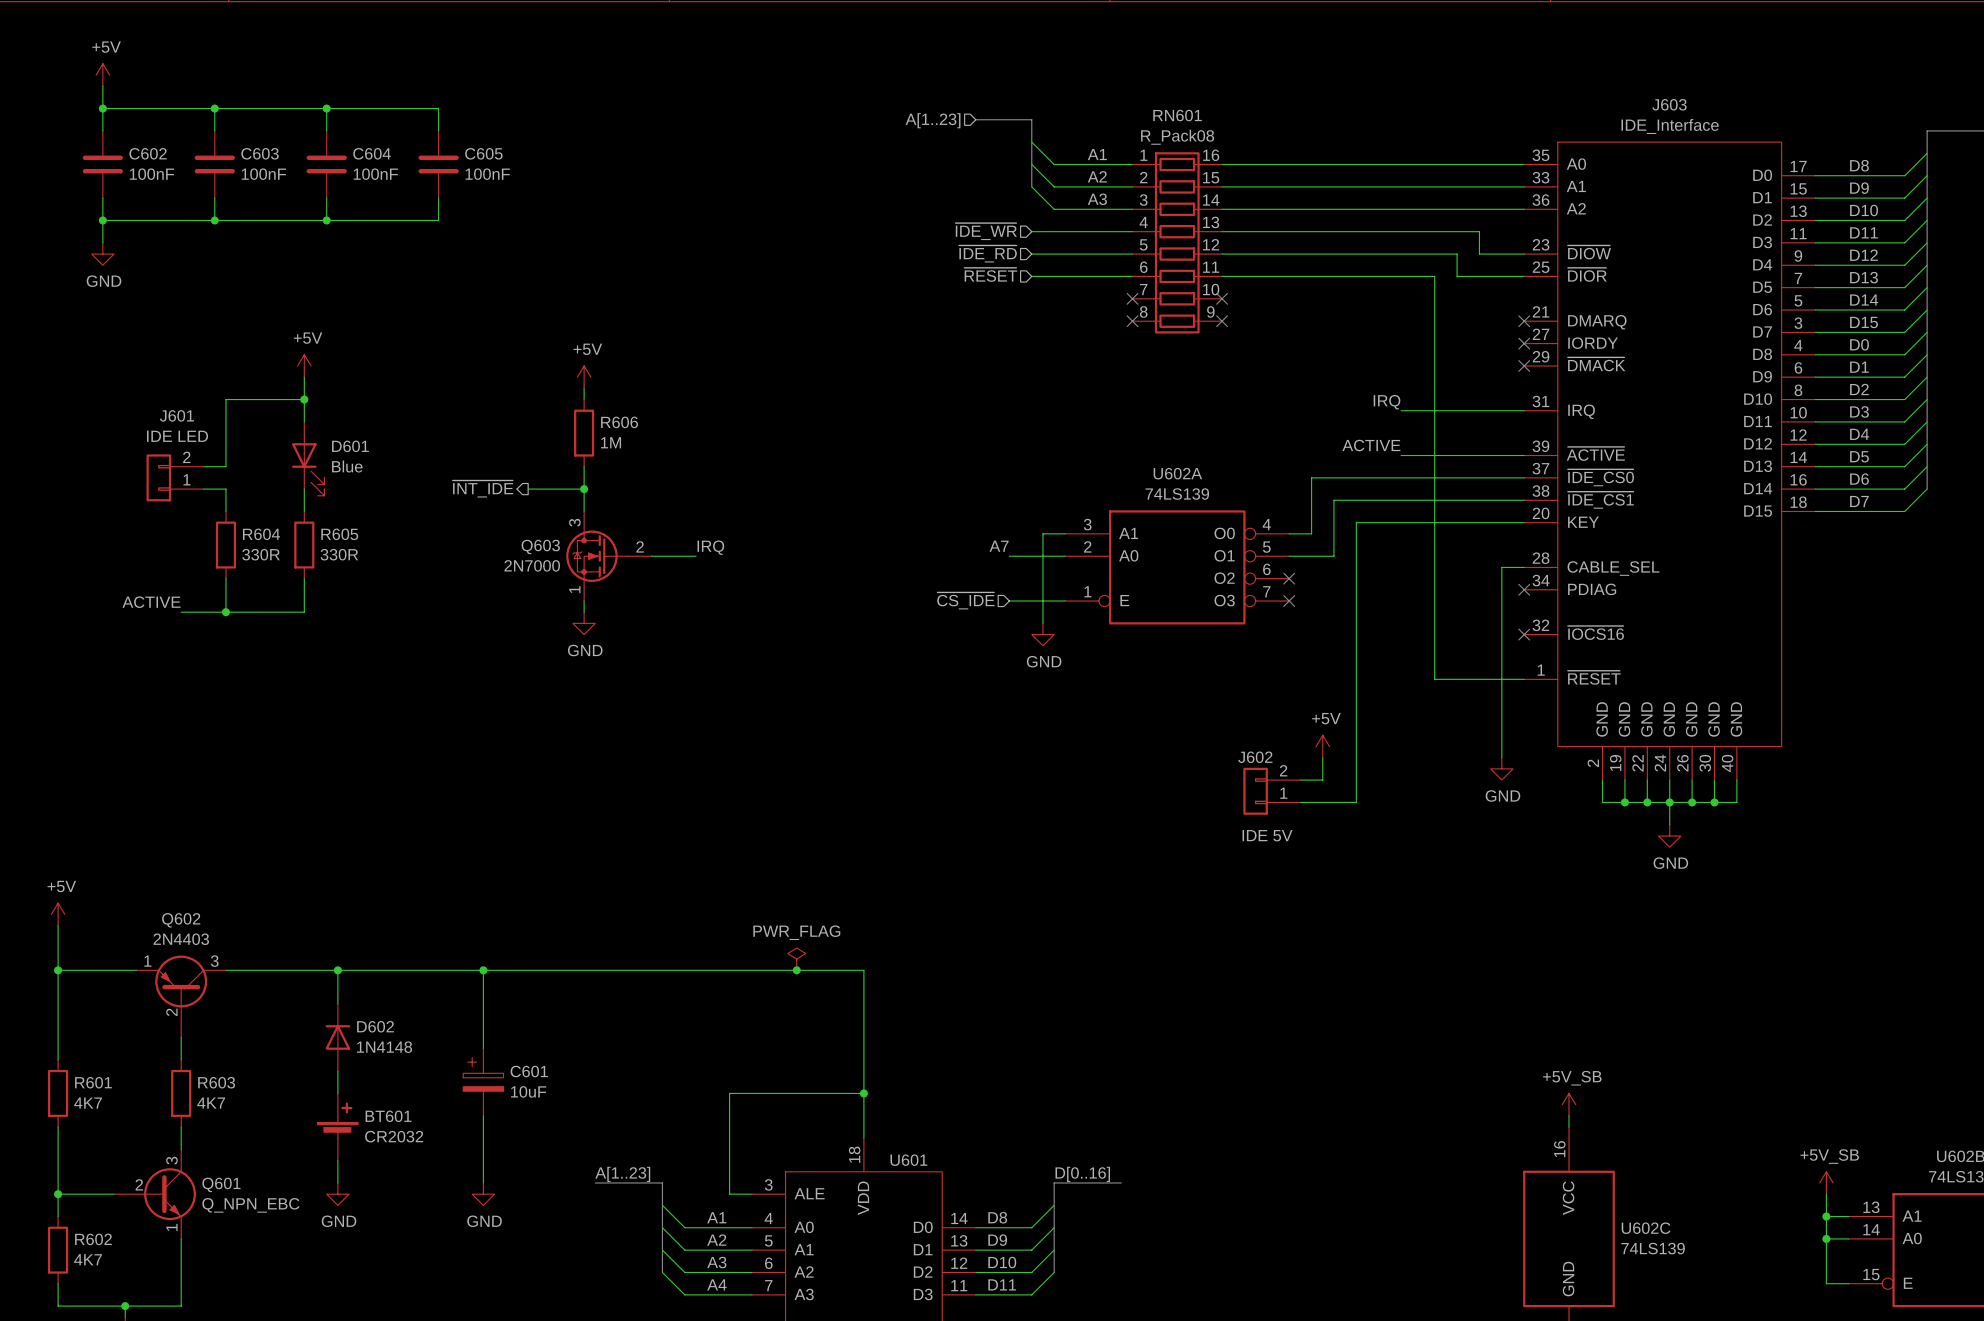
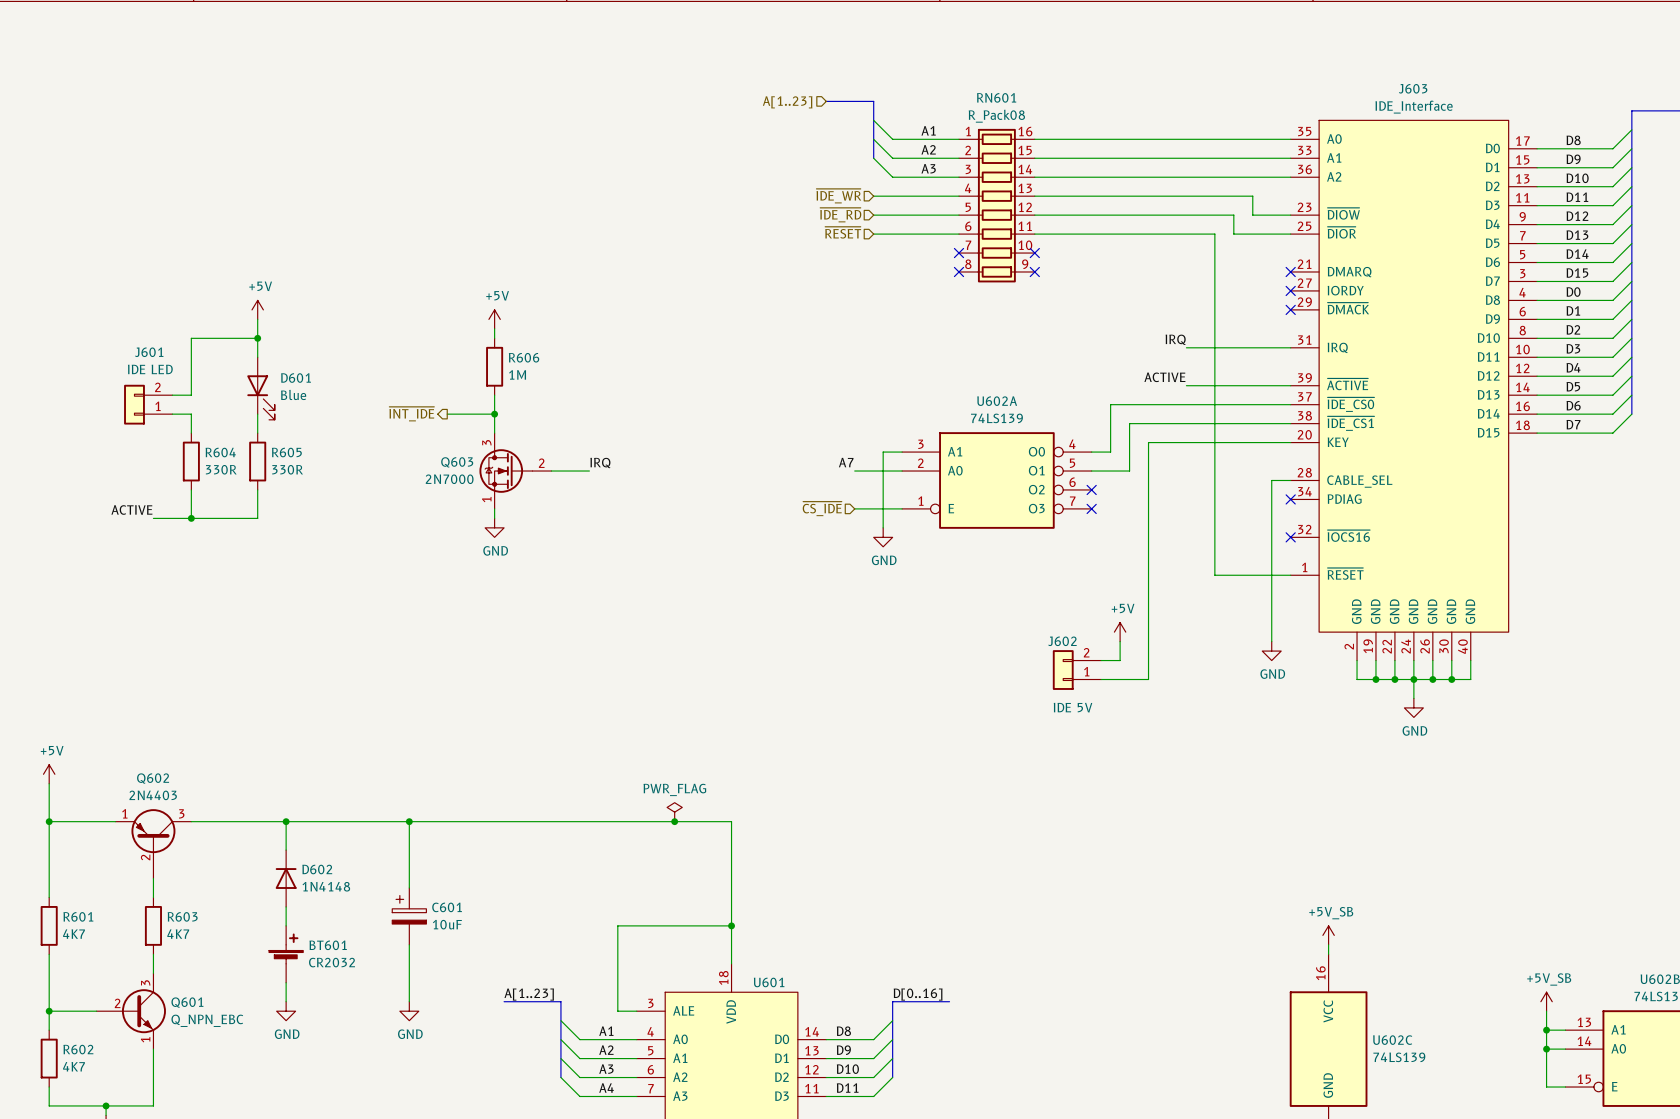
power symbol: +5V (102, 74) -> none
wire: (102, 86) (102, 130) -> none
wire: (102, 108) (438, 108) (438, 130) -> none
junction: (102, 108) -> none
wire: (214, 108) (214, 130) -> none
junction: (214, 108) -> none
wire: (326, 108) (326, 130) -> none
junction: (326, 108) -> none
C602: 100nF (102, 164) -> none
C603: 100nF (214, 164) -> none
C604: 100nF (326, 164) -> none
C605: 100nF (438, 164) -> none
wire: (102, 198) (102, 242) -> none
wire: (214, 198) (214, 220) -> none
wire: (326, 198) (326, 220) -> none
wire: (438, 198) (438, 220) (102, 220) -> none
junction: (102, 220) -> none
junction: (214, 220) -> none
junction: (326, 220) -> none
power symbol: GND (102, 254) -> none

